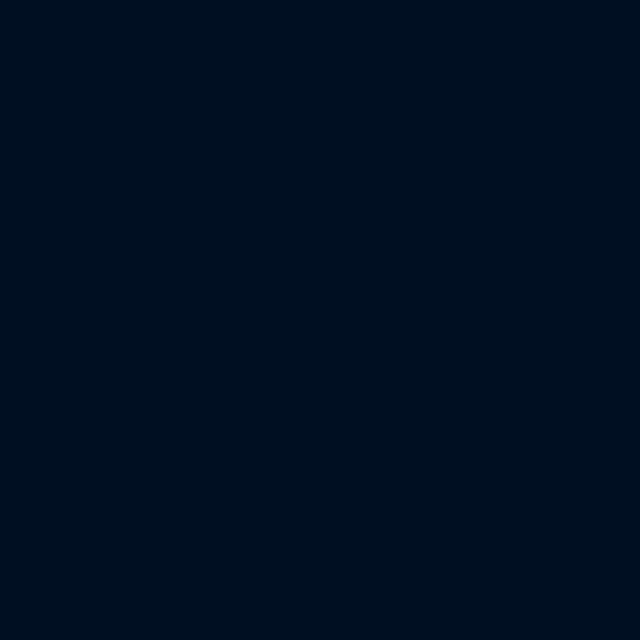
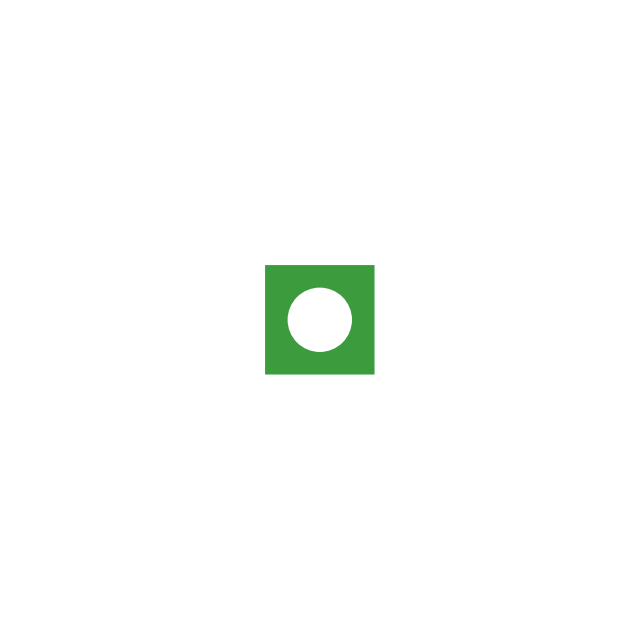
part: none -> (319, 319)

